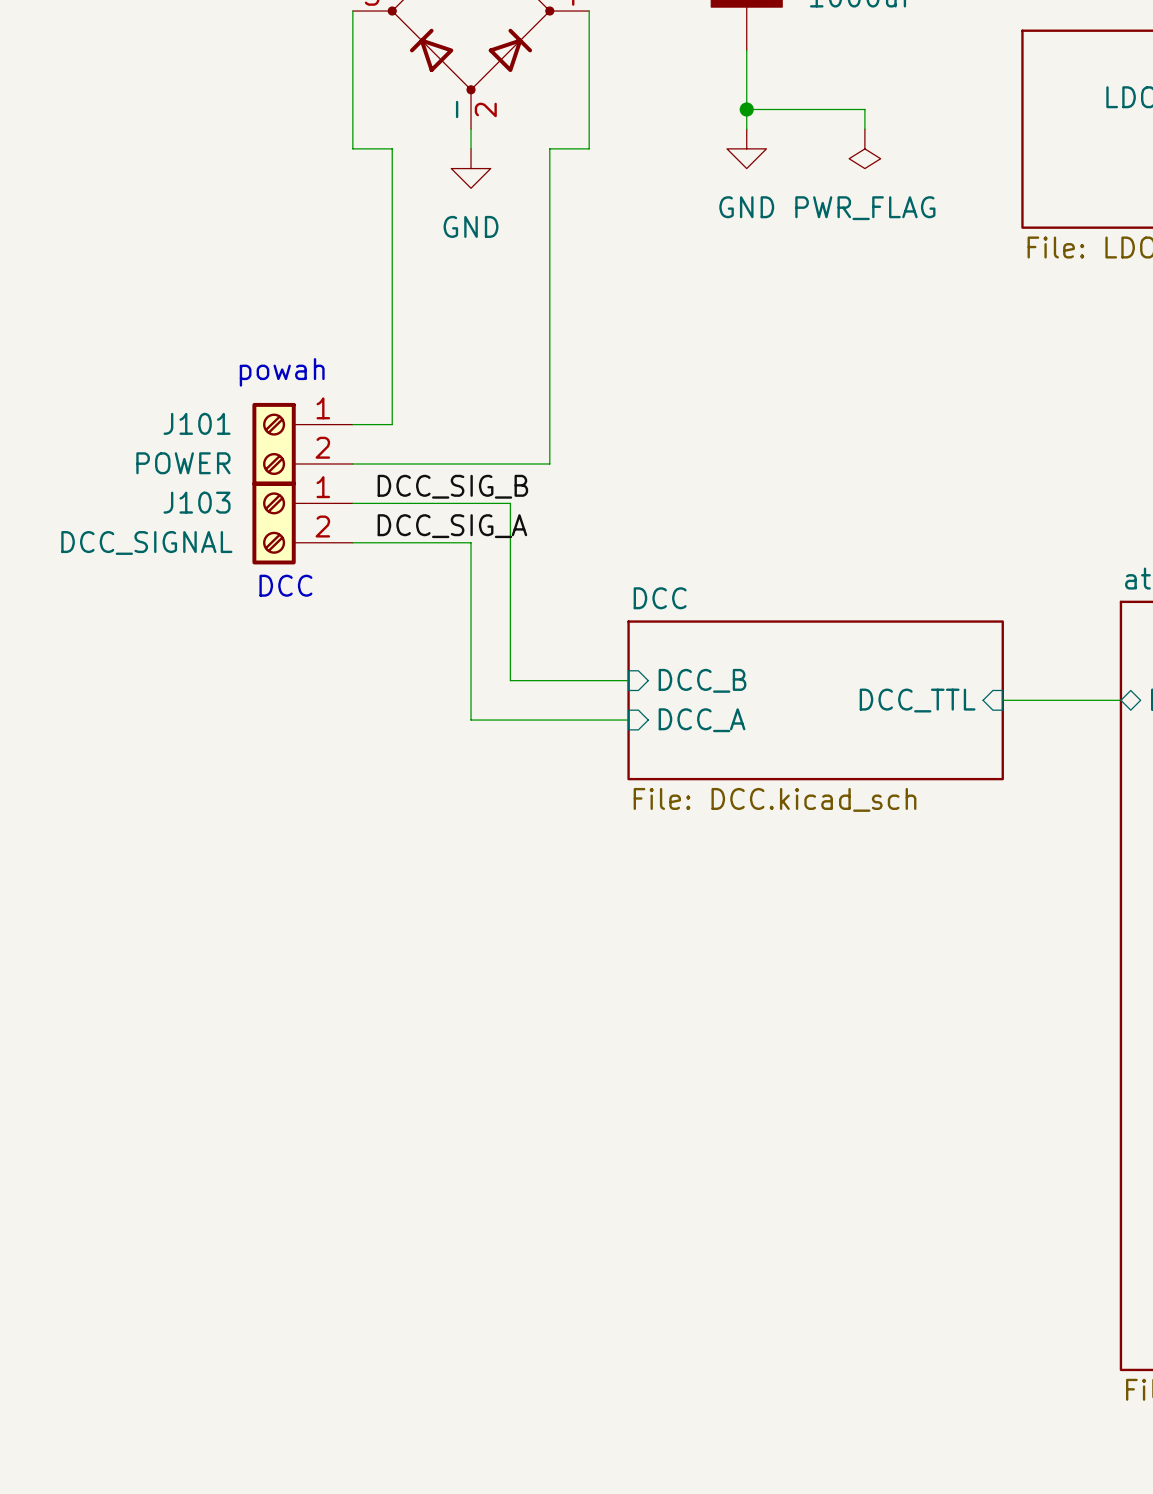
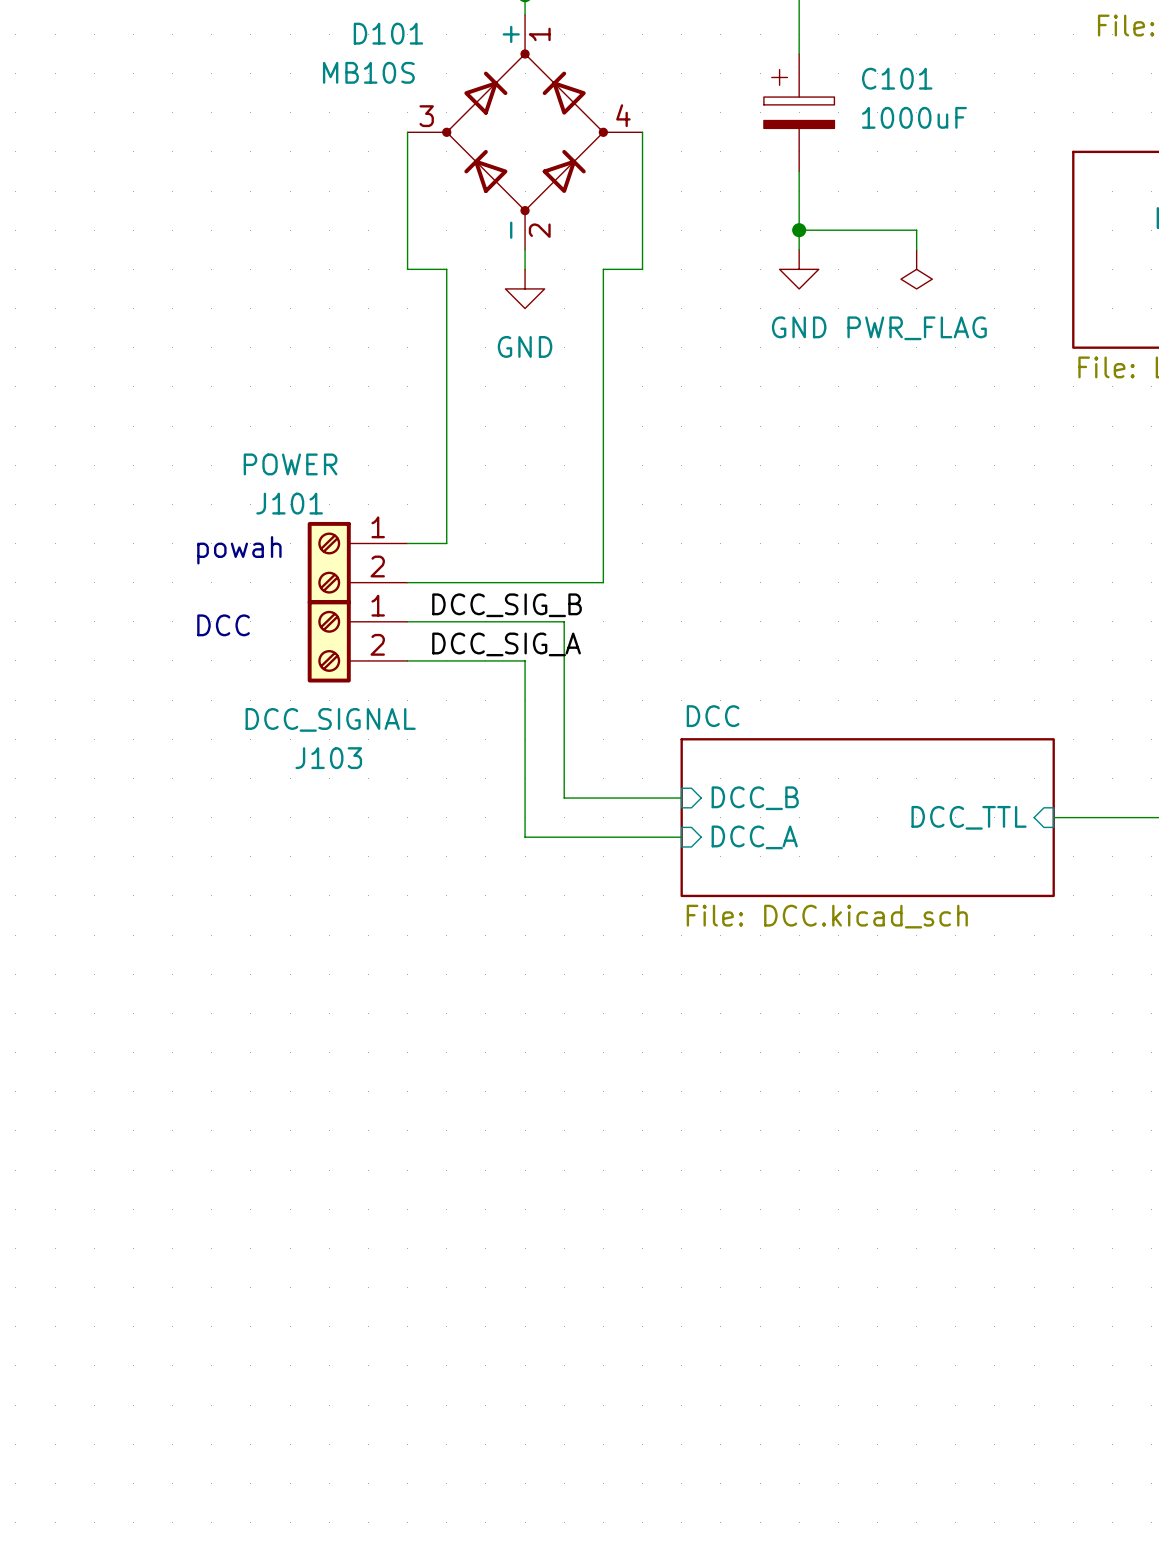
text position: powah (282, 372) -> powah (239, 550)
J101 name position: J101 (197, 423) -> J101 (289, 503)
J101 value position: POWER (183, 463) -> POWER (290, 464)
J103 name position: J103 (197, 502) -> J103 (328, 758)
J103 value position: DCC_SIGNAL (146, 542) -> DCC_SIGNAL (330, 719)
text position: DCC (285, 585) -> DCC (223, 625)

